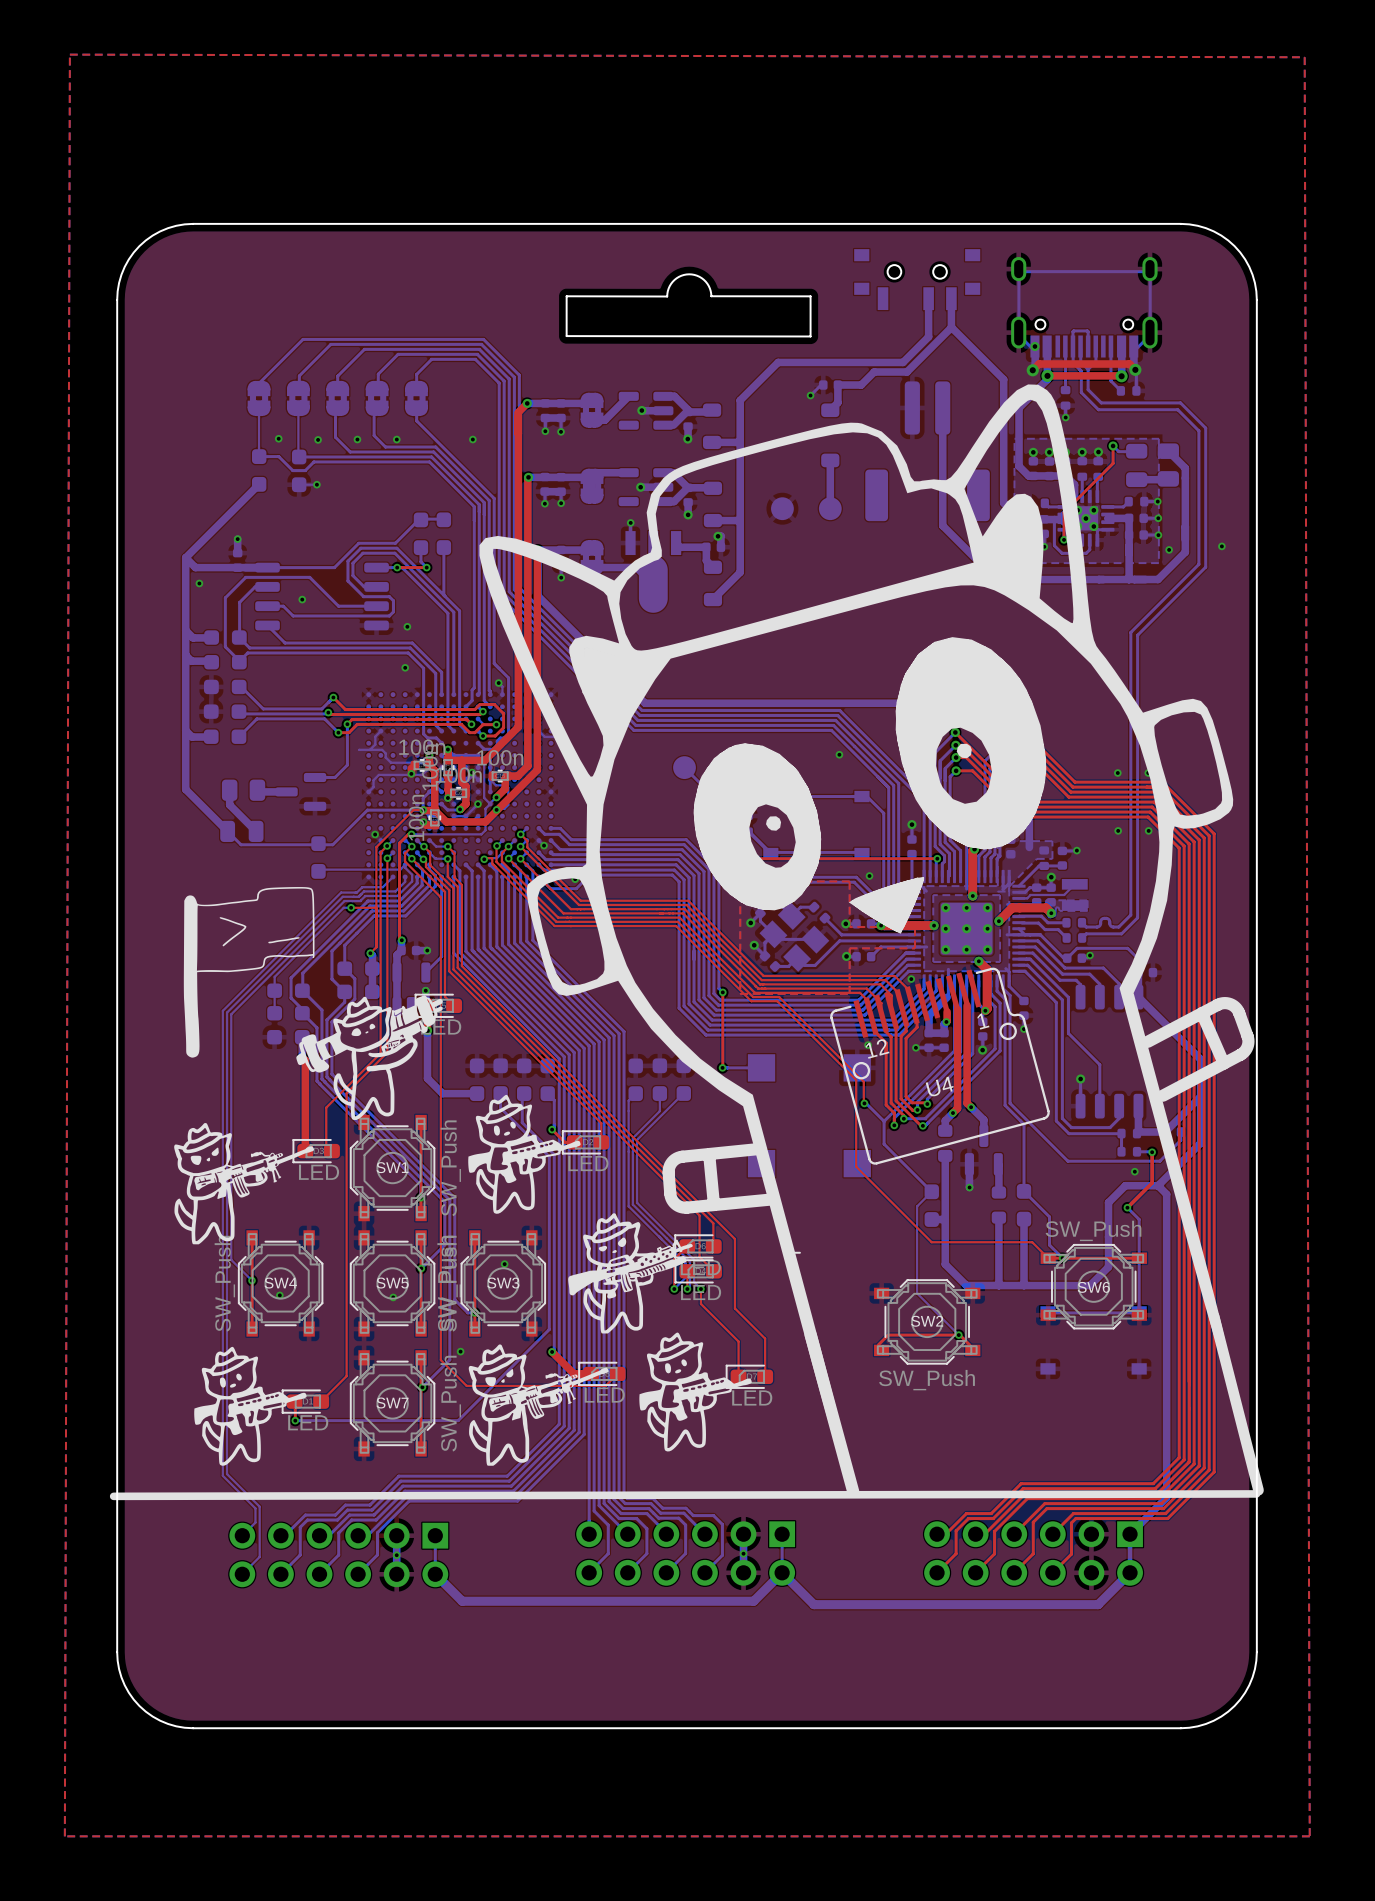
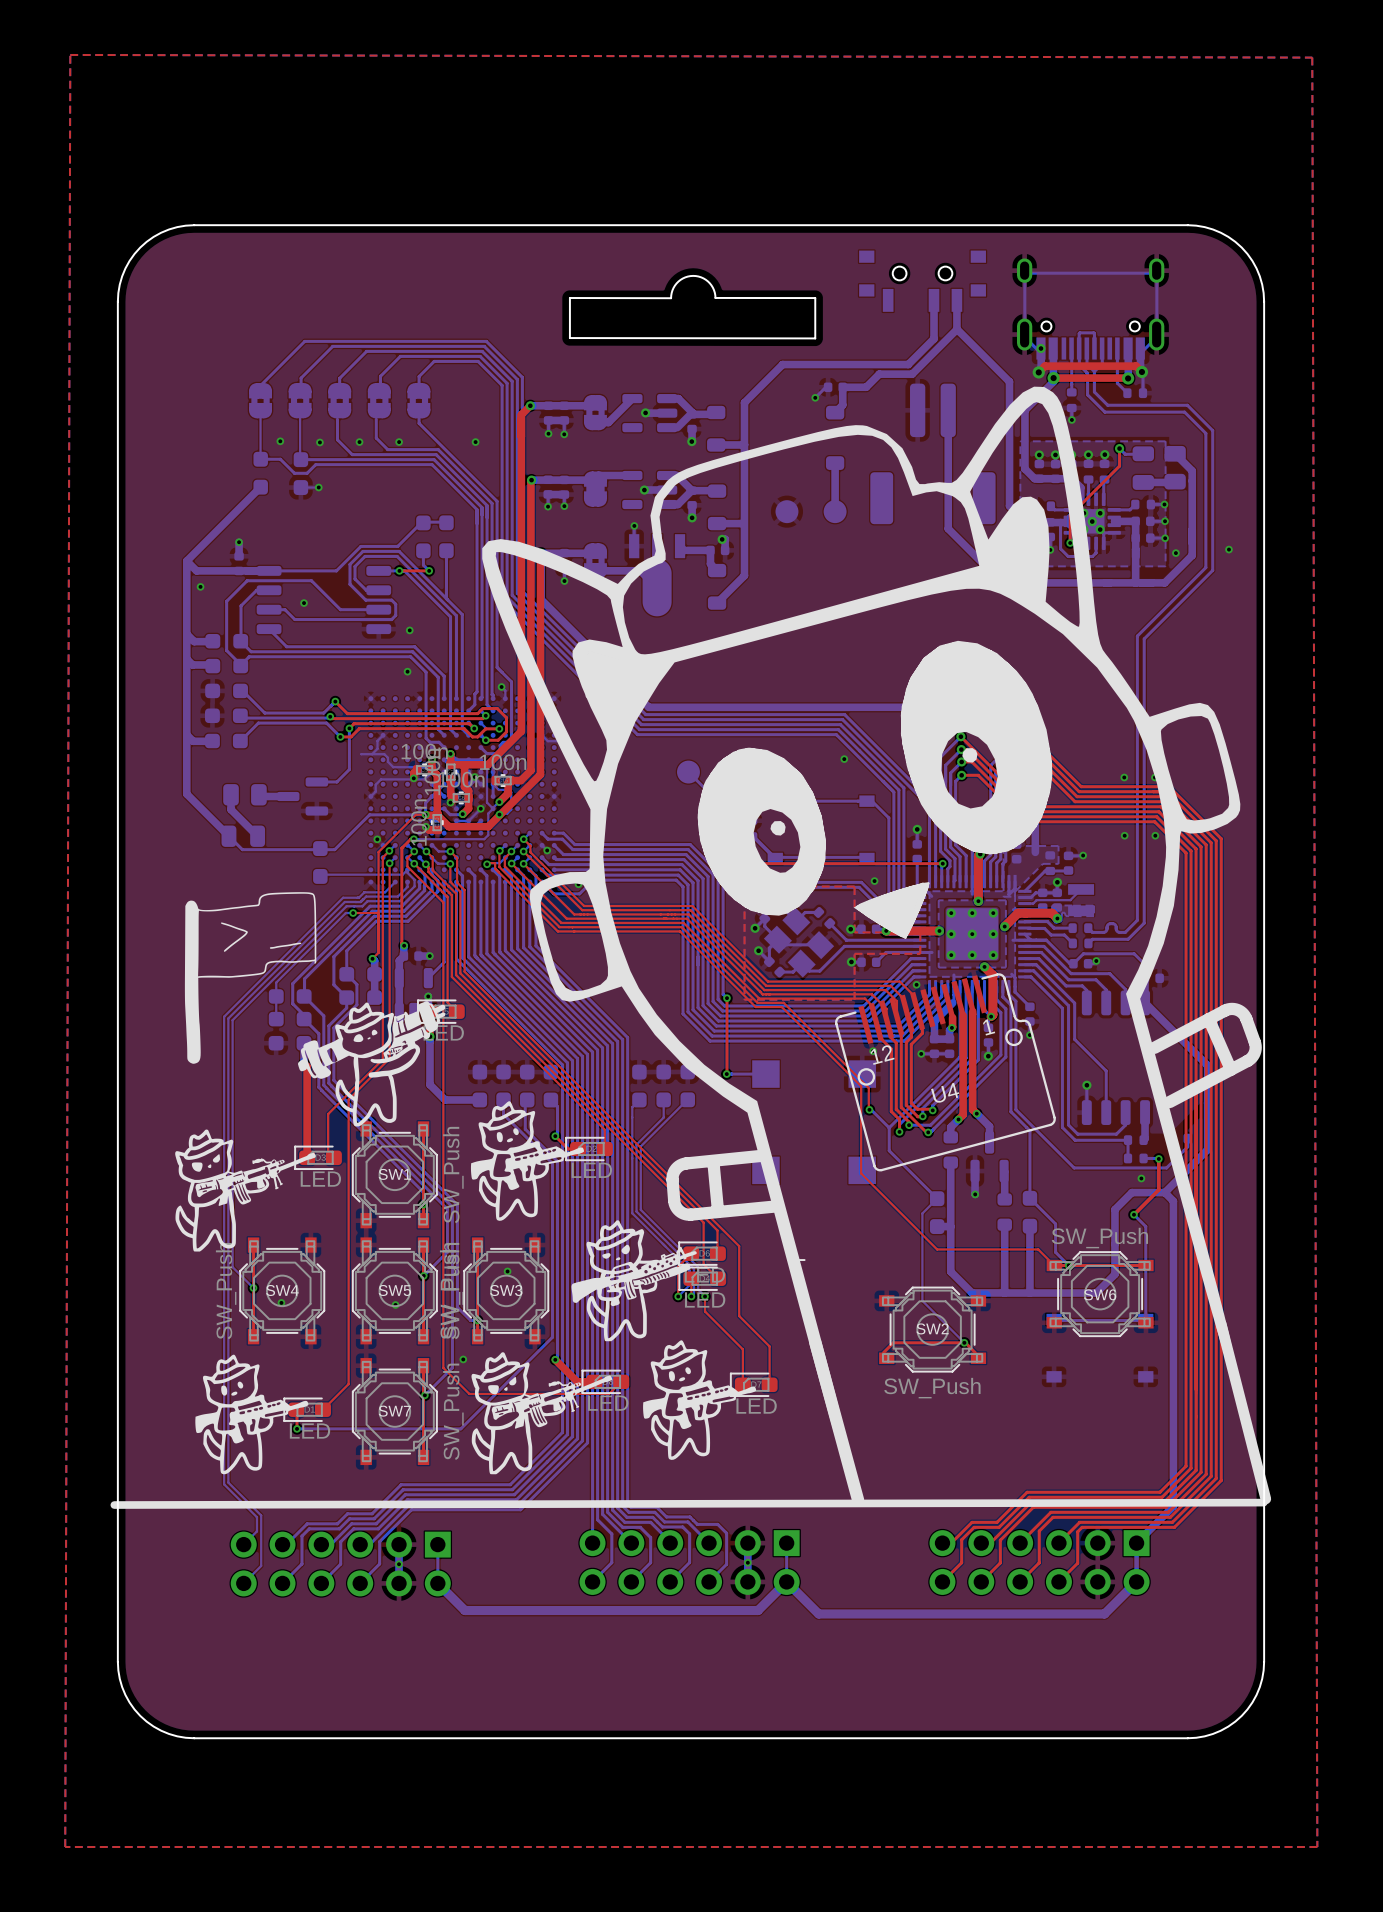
bottom track: (1200, 1096) (1165, 1132) (1138, 1132) -> none

